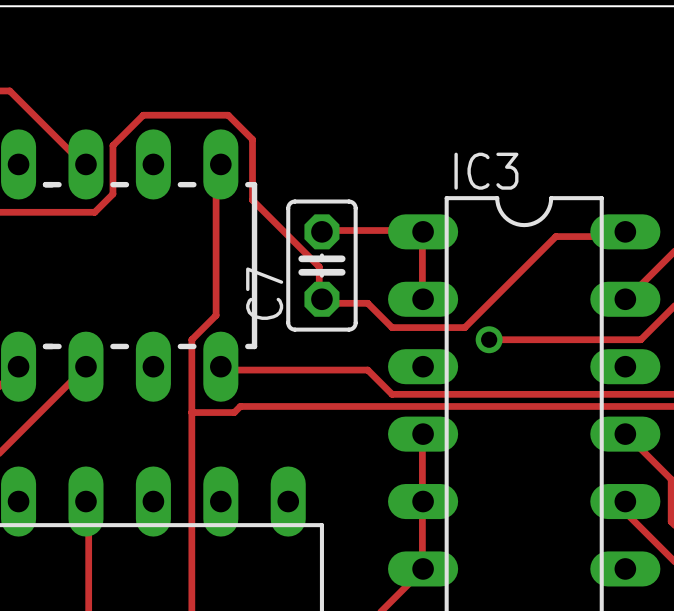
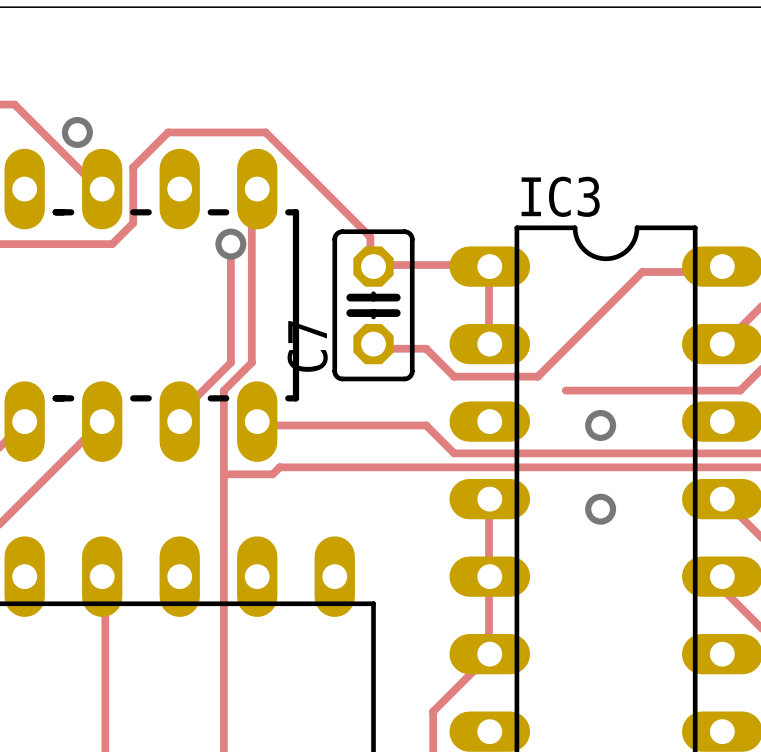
via: none -> (77, 132)
track: (252, 139) (252, 200) (319, 266) (319, 297) (321, 299) -> (293, 160) (370, 237) (370, 265) (373, 266)
track: none -> (230, 244) (230, 362) (175, 418) (179, 421)
via: none -> (230, 244)
via position: (489, 339) -> (600, 425)
via: none -> (600, 509)

